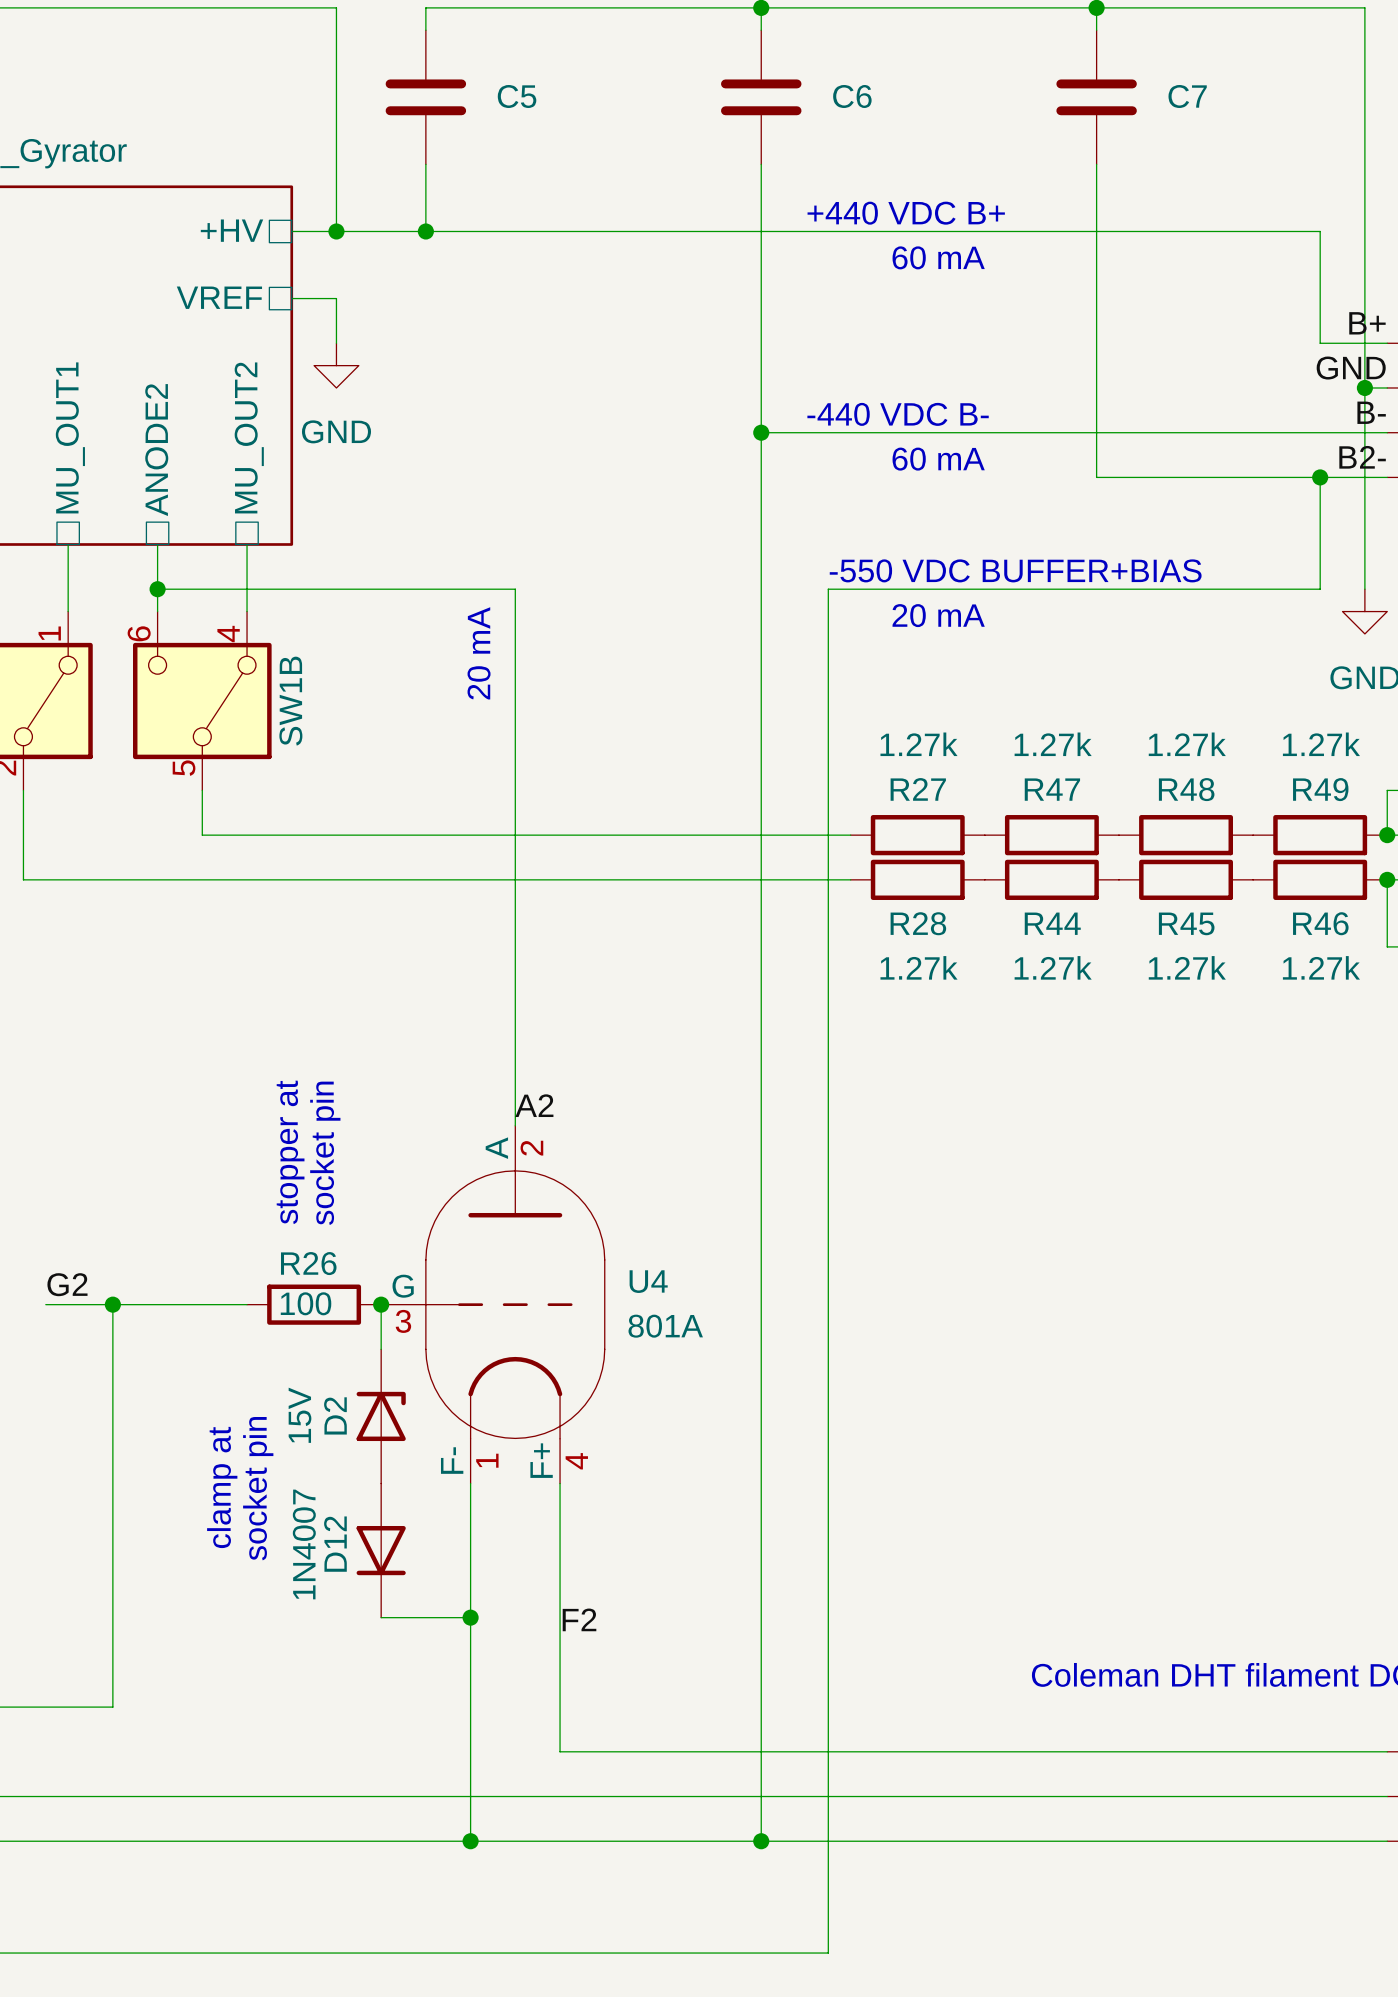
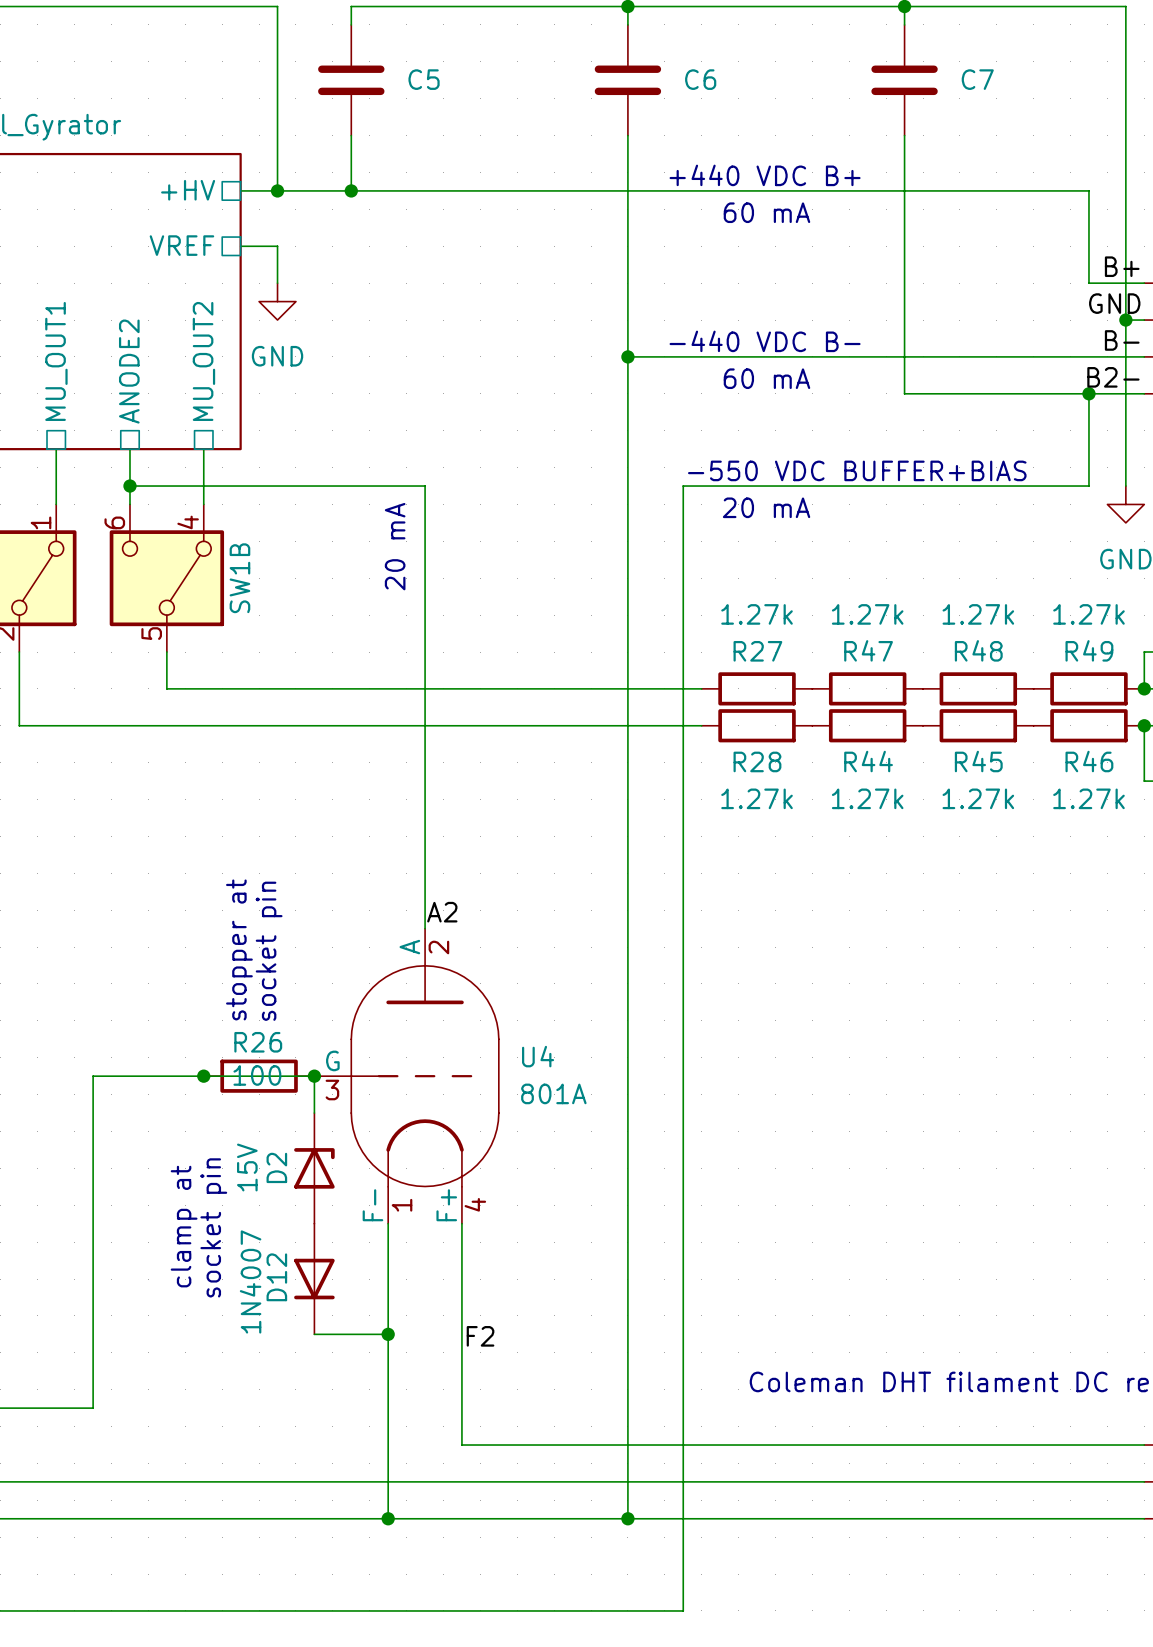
label: G2 (67, 1284) -> none
wire: (45, 1304) (112, 1304) -> none
junction: (112, 1304) -> none
wire: none -> (203, 1076) (314, 1076)
junction: none -> (203, 1076)

